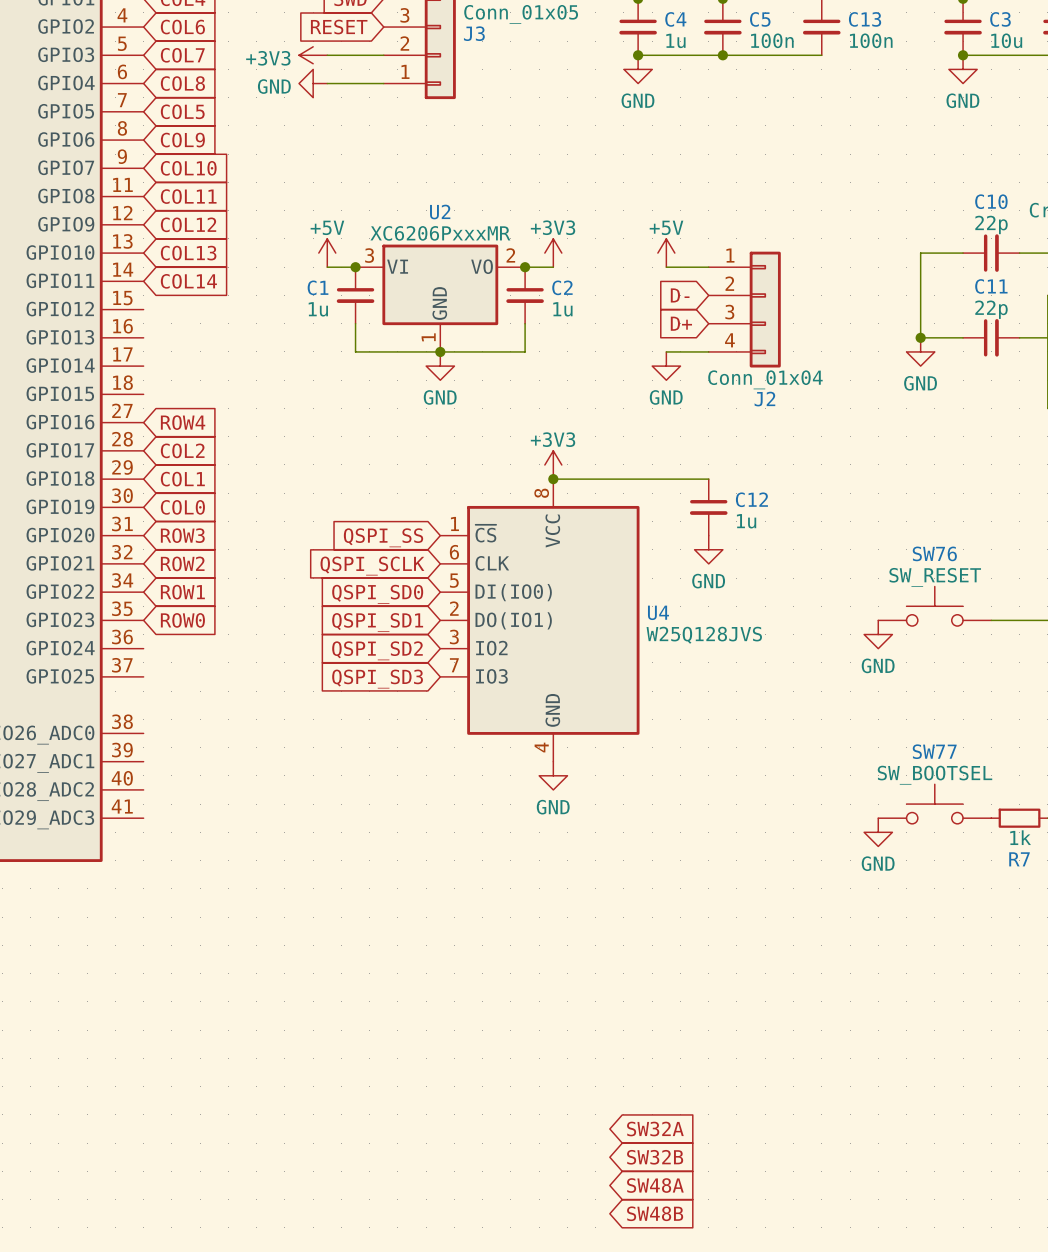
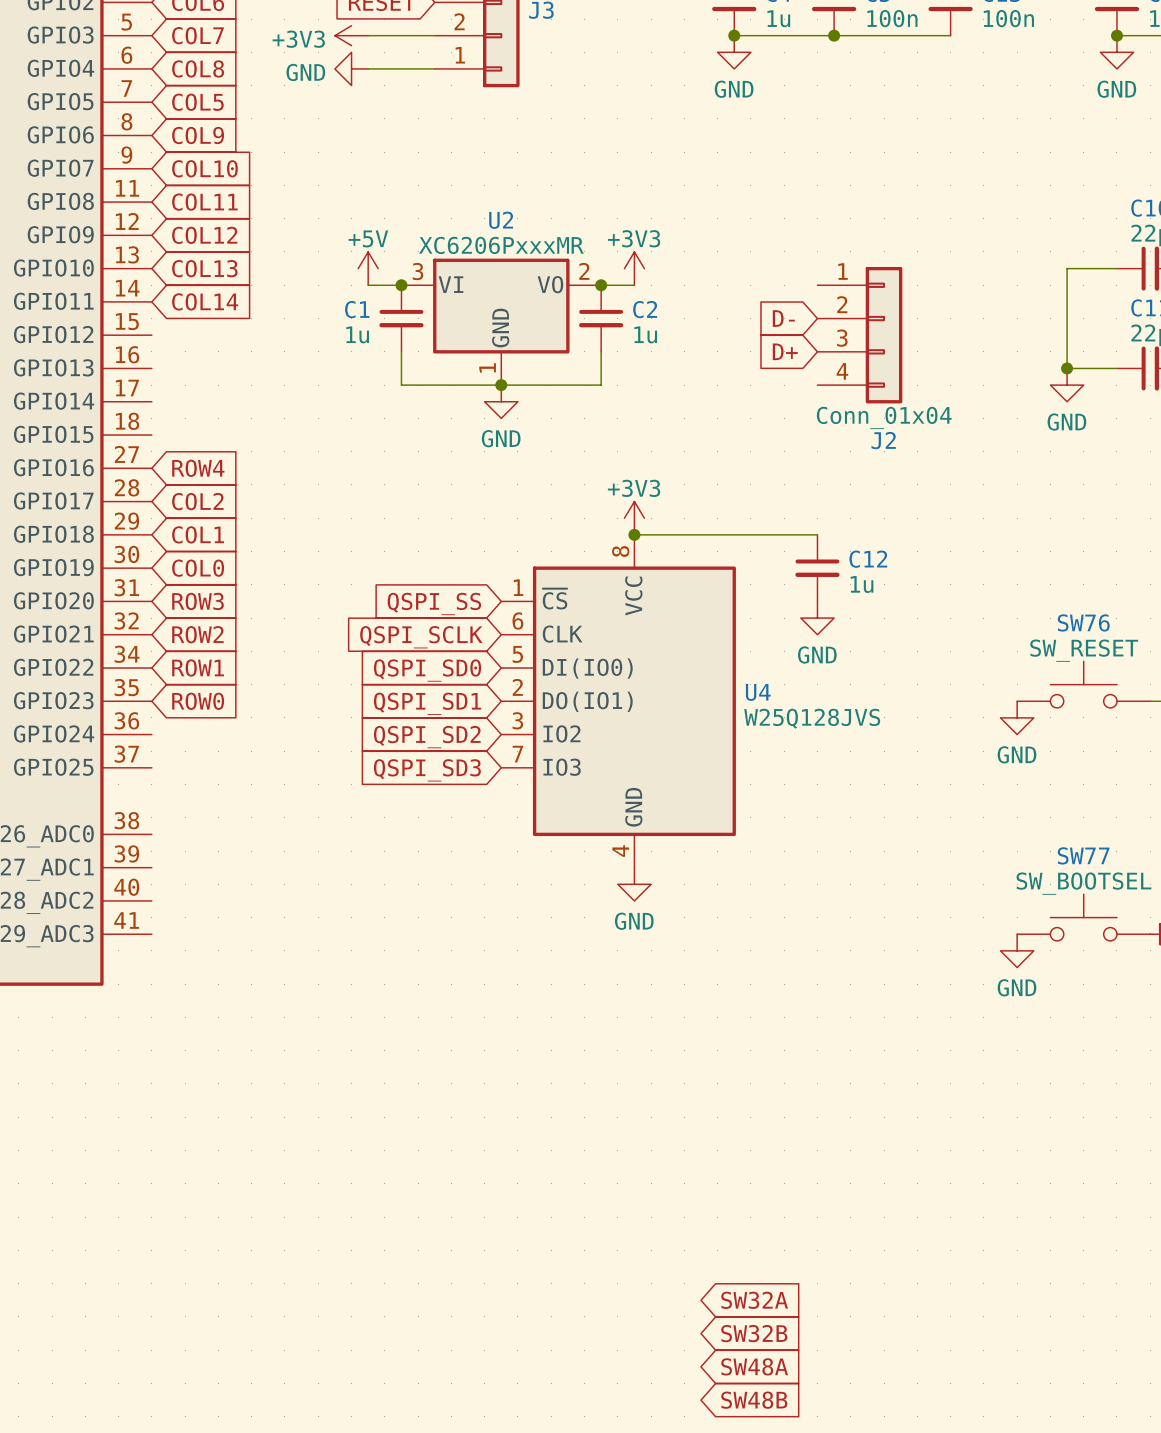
power symbol: +5V (666, 253) -> none
wire: (666, 267) (708, 267) -> none
wire: (666, 351) (708, 351) -> none
power symbol: GND (666, 366) -> none

